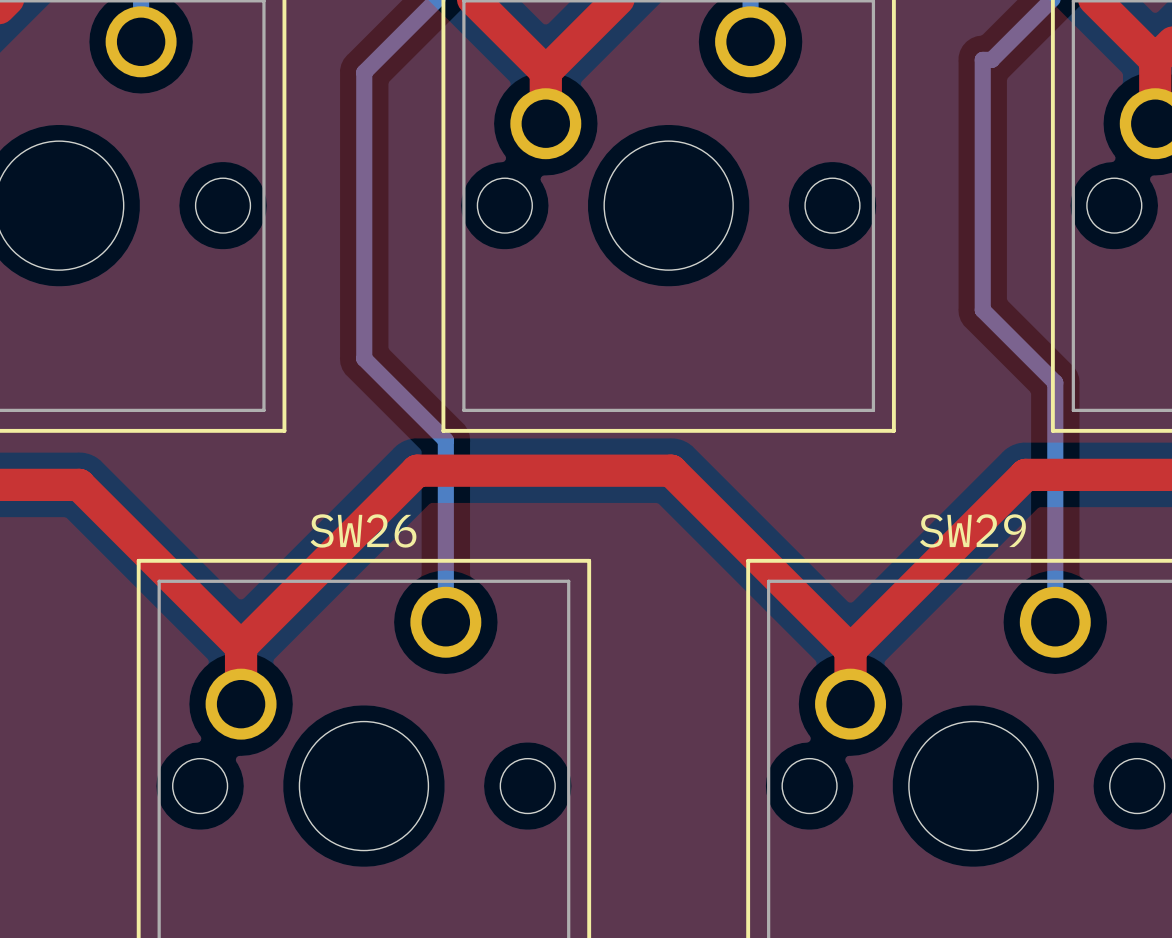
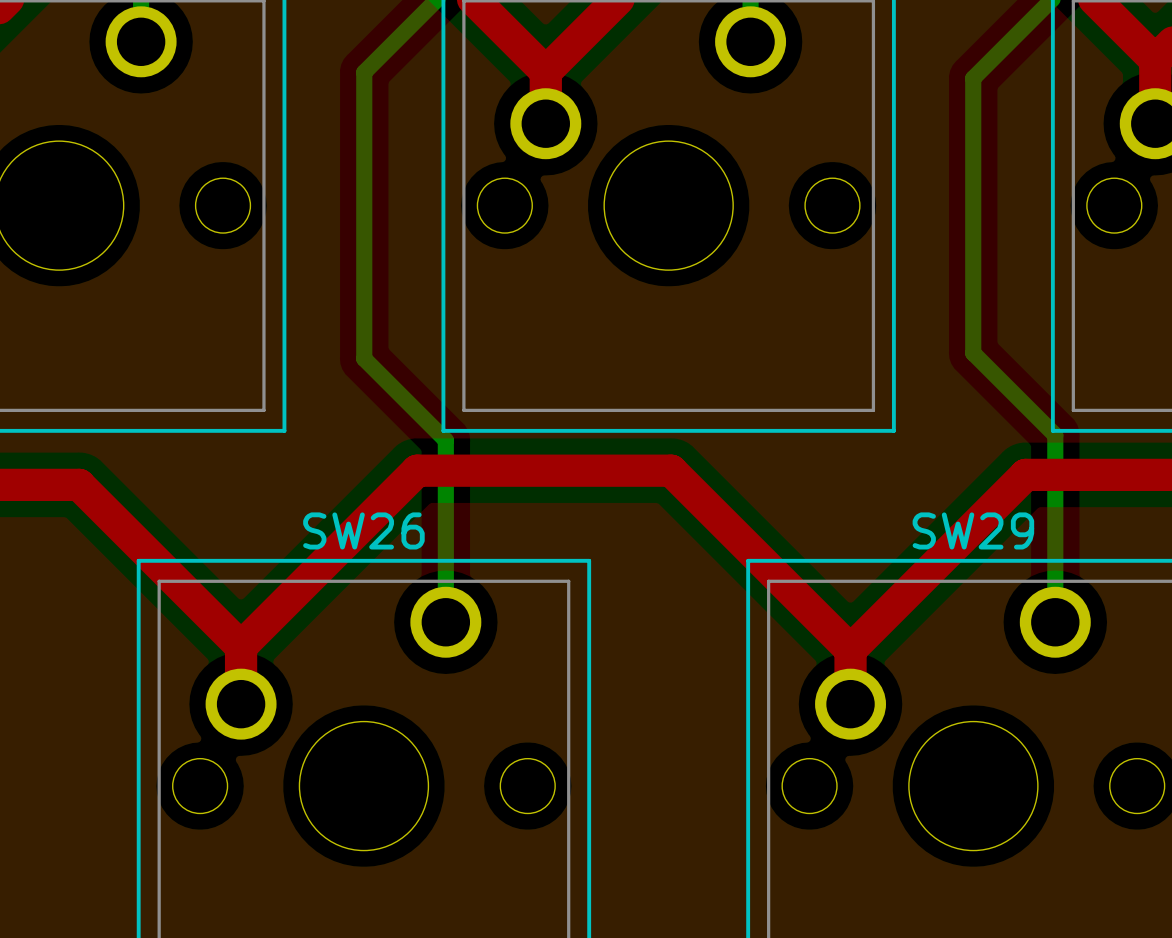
bottom track: (991, 59) (982, 59) (982, 310) (1055, 382) (1055, 435) -> (991, 59) (973, 78) (973, 353) (1055, 435)

